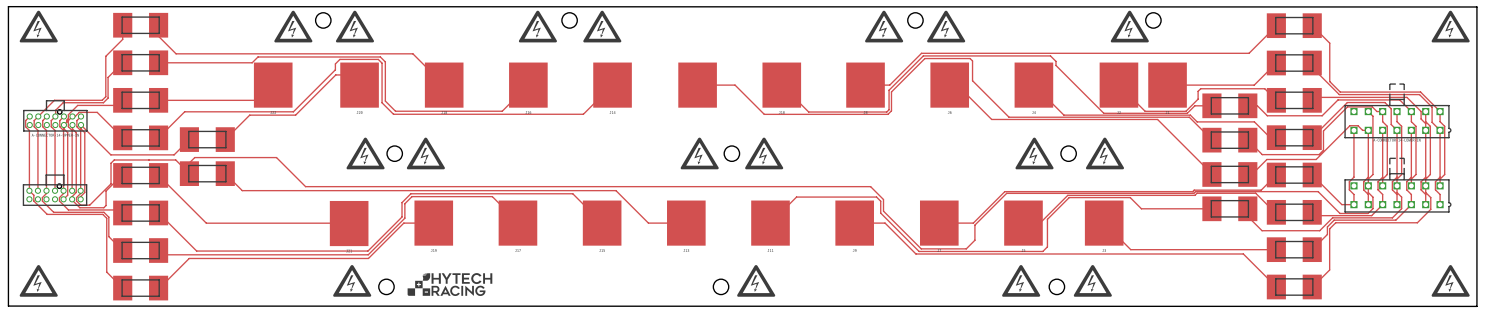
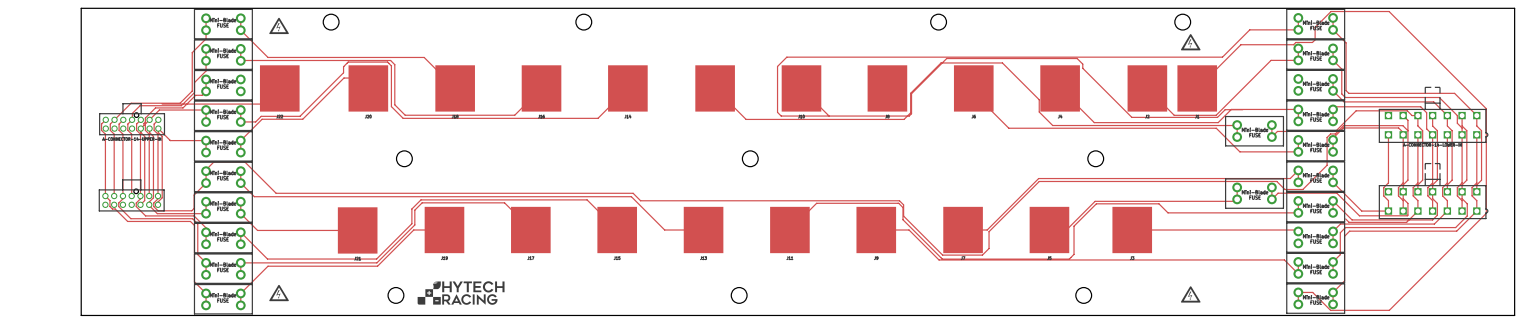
board edge: (1476, 7) (8, 6) (8, 306) (1476, 306) -> (1514, 8) (81, 8) (81, 315) (1514, 315)
drawing: [19, 10, 58, 43] -> none
drawing: [274, 10, 313, 43] -> none
drawing: [335, 10, 374, 43] -> none
drawing: [518, 10, 557, 43] -> none
drawing: [583, 10, 622, 43] -> none
drawing: [865, 10, 904, 43] -> none
drawing: [927, 10, 966, 43] -> none
drawing: [1110, 10, 1149, 43] -> none
drawing: [1431, 10, 1470, 43] -> none
track: none -> (206, 18) (206, 38) (192, 52) (192, 91) (180, 103) (131, 103) (110, 124) (110, 130) (114, 134) (114, 196)
drawing: none -> [269, 17, 289, 35]
track: none -> (1298, 17) (1298, 29) (1249, 29) (1222, 57) (786, 57) (777, 66) (777, 112) (781, 116) (829, 116)
part: none -> (223, 24)
part: none -> (1315, 24)
track: (122, 25) (122, 39) (105, 56) (105, 96) (102, 100) (54, 100) (34, 120) (34, 126) (37, 130) (37, 190) -> none
part: (140, 25) -> none
track: (158, 25) (158, 36) (176, 53) (413, 54) -> (240, 18) (240, 30) (267, 57) (424, 57)
track: (1276, 25) (1249, 53) (921, 53) (889, 85) (865, 85) -> none
part: (1294, 25) -> none
track: (1312, 25) (1329, 43) (1329, 81) (1340, 92) (1420, 92) -> (1333, 17) (1333, 29) (1346, 42) (1346, 90) (1348, 93) (1454, 93) (1456, 95)
drawing: none -> [1180, 34, 1201, 51]
track: none -> (206, 48) (206, 71) (194, 82) (194, 92) (181, 105) (140, 105) (132, 113) (132, 119) (127, 124) (127, 130) (131, 134) (131, 196)
part: none -> (223, 54)
part: none -> (1315, 54)
track: (381, 57) (257, 56) (252, 62) (158, 62) -> (390, 60) (240, 60) (240, 48)
track: (122, 62) (108, 77) (108, 98) (103, 102) (63, 102) (55, 110) (55, 116) (51, 120) (51, 126) (55, 130) (55, 190) -> none
part: (140, 62) -> none
track: (1276, 63) (1254, 85) (1167, 85) -> (1298, 304) (1298, 292) (1312, 292) (1330, 310) (1389, 310) (1486, 213) (1486, 108) (1389, 11) (1331, 11) (1315, 27) (1315, 39) (1312, 42) (1295, 42) (1293, 44) (1240, 44) (1197, 88)
part: (1294, 63) -> none
track: (1312, 63) (1312, 67) (1339, 94) (1419, 94) (1432, 107) (1432, 122) (1440, 130) -> none
track: none -> (206, 79) (206, 91) (202, 95) (195, 95) (182, 107) (155, 107) (145, 118) (143, 125) (140, 128) (140, 132) (144, 136) (144, 200) (140, 204)
part: none -> (223, 85)
part: none -> (1315, 85)
track: (697, 85) (735, 85) (764, 114) (887, 114) (891, 110) (891, 91) (924, 58) (970, 58) (972, 60) (972, 80) (1009, 117) (1189, 117) (1211, 140) -> (715, 88) (746, 119) (904, 119) (910, 112) (910, 93) (941, 62) (1002, 62) (1039, 99) (1039, 112) (1052, 125) (1237, 125) (1237, 137)
track: (949, 85) (957, 85) (991, 119) (1157, 119) (1211, 174) -> (973, 88) (973, 93) (1008, 128) (1216, 128) (1239, 151) (1298, 151) (1298, 139)
track: (1406, 97) (1315, 97) (1312, 100) -> (1442, 101) (1439, 97) (1345, 97) (1341, 93) (1341, 69) (1333, 60) (1333, 48)
track: (1198, 99) (1198, 91) (1200, 88) (1264, 88) (1276, 100) -> (1228, 102) (1271, 60) (1298, 60) (1298, 48)
track: (1399, 99) (1338, 99) (1322, 115) (1267, 115) (1257, 105) (1247, 105) -> (1435, 103) (1433, 101) (1344, 101) (1333, 90) (1333, 78)
track: (122, 100) (117, 105) (77, 105) (68, 114) (66, 121) (63, 125) (63, 128) (67, 132) (67, 195) (63, 199) -> none
part: (140, 100) -> none
part: (1294, 100) -> none
track: (1385, 102) (1347, 102) (1312, 137) -> (1420, 106) (1335, 106) (1333, 109) (1333, 121)
part: (1229, 105) -> none
track: (1347, 106) (1323, 130) (1323, 150) (1319, 154) (1262, 154) (1247, 140) -> (1381, 110) (1356, 110) (1335, 131) (1277, 131) (1271, 137) (1271, 125)
part: none -> (223, 115)
track: (293, 111) (184, 111) (158, 137) -> (300, 115) (261, 116) (255, 121) (240, 121) (240, 110)
part: none -> (1315, 115)
part position: (55, 115) -> (132, 119)
track: none -> (105, 119) (101, 124) (101, 130) (105, 134) (105, 196) (109, 200) (109, 206) (127, 221) (190, 221) (194, 225) (194, 281) (206, 293) (206, 305)
track: none -> (123, 119) (119, 124) (119, 130) (122, 134) (122, 198) (118, 203) (118, 206) (130, 218) (192, 218) (197, 223) (197, 254) (206, 262) (206, 274)
track: none -> (140, 119) (136, 124) (136, 130) (140, 134) (140, 198) (136, 203) (136, 206) (145, 215) (194, 215) (206, 227) (206, 244)
track: none -> (158, 119) (154, 124) (154, 130) (157, 134) (157, 198) (153, 203) (153, 206) (158, 210) (191, 210) (194, 208) (194, 195) (206, 183) (206, 169) (213, 161) (244, 161) (276, 193) (633, 193) (640, 200) (899, 200) (903, 204) (903, 216) (942, 255) (982, 255) (989, 248) (989, 231) (1039, 181) (1276, 181) (1284, 189) (1302, 189) (1327, 165) (1327, 137) (1330, 133) (1335, 133) (1343, 125) (1402, 125) (1407, 130)
track: (256, 115) (249, 115) (225, 139) -> (262, 119) (240, 140) (240, 152)
track: (1063, 115) (1190, 115) (1197, 121) (1254, 121) (1270, 137) (1276, 137) -> (1090, 119) (1094, 122) (1218, 122) (1231, 109) (1298, 109) (1298, 121)
track: (29, 116) (25, 120) (25, 126) (29, 130) (29, 190) (33, 195) (33, 201) (47, 214) (102, 214) (106, 218) (106, 272) (122, 288) -> none
track: (46, 116) (42, 120) (42, 126) (46, 130) (46, 193) (42, 197) (42, 201) (53, 212) (103, 212) (108, 217) (108, 236) (122, 250) -> none
track: (63, 116) (59, 120) (59, 126) (63, 130) (63, 193) (59, 197) (59, 201) (68, 209) (119, 209) (122, 212) -> none
track: (81, 116) (76, 120) (76, 126) (80, 130) (80, 193) (76, 197) (76, 201) (80, 205) (89, 205) (111, 183) (111, 163) (114, 160) (175, 160) (189, 173) (189, 162) (194, 157) (276, 157) (305, 186) (870, 186) (883, 199) (883, 211) (921, 248) (966, 248) (974, 240) (974, 225) (1006, 193) (1318, 191) (1340, 213) (1368, 213) (1372, 209) -> (1271, 187) (1271, 199) (1278, 193) (1336, 193) (1359, 215) (1407, 215)
track: none -> (206, 121) (206, 110) (159, 110) (145, 124) (145, 130) (149, 134) (149, 196)
track: none -> (149, 128) (149, 132) (153, 136) (153, 197) (149, 202) (149, 205) (157, 213) (206, 213) (206, 201)
track: (72, 125) (72, 128) (76, 132) (76, 192) (72, 196) (72, 200) (79, 207) (103, 207) (106, 205) (106, 191) (122, 175) -> none
part: none -> (1254, 131)
track: (1368, 130) (1362, 130) (1357, 125) (1349, 125) (1316, 159) (1266, 159) (1251, 174) (1247, 174) -> (1403, 134) (1398, 127) (1343, 127) (1333, 138) (1333, 151)
track: (122, 137) (97, 112) (79, 112) (68, 120) (68, 126) (72, 130) (72, 190) -> none
part: (140, 137) -> none
drawing: [346, 137, 385, 170] -> none
drawing: [406, 137, 445, 170] -> none
drawing: [680, 137, 719, 170] -> none
drawing: [745, 137, 784, 170] -> none
drawing: [1015, 137, 1054, 170] -> none
drawing: [1085, 137, 1124, 170] -> none
part: (1294, 137) -> none
track: (189, 139) (174, 154) (110, 154) (81, 125) (81, 128) (84, 132) (84, 192) (80, 199) -> none
part: (207, 139) -> none
part: (1229, 140) -> none
part: none -> (223, 146)
part: none -> (1315, 146)
track: none -> (206, 152) (206, 140) (170, 140) (158, 128) (158, 132) (162, 136) (162, 197) (157, 204)
part: none -> (223, 176)
part: none -> (1315, 176)
part: (207, 173) -> none
track: (225, 173) (242, 190) (248, 190) -> (240, 171) (240, 183) (254, 196)
part: (1229, 174) -> none
part: (140, 175) -> none
track: (158, 175) (206, 223) (349, 223) -> (240, 201) (240, 213) (257, 230) (357, 230)
track: (1276, 175) (1261, 190) (1004, 191) (973, 223) (962, 223) -> (1298, 182) (1298, 170) (1290, 178) (1038, 178) (987, 230)
part: (1294, 175) -> none
track: (1312, 175) (1341, 204) -> (1333, 170) (1333, 182) (1361, 211) (1376, 211)
part: none -> (1254, 193)
part position: (55, 190) -> (131, 195)
track: (1067, 195) (1255, 193) (1276, 212) -> (1094, 201) (1235, 201) (1237, 199) (1237, 187)
part: none -> (1315, 207)
part: none -> (223, 207)
track: none -> (1476, 211) (1456, 231) (1349, 231) (1344, 236) (1344, 280) (1333, 292) (1333, 304)
track: (1139, 206) (1141, 208) (1211, 208) -> (1167, 212) (1298, 212) (1298, 200)
part: (1229, 208) -> none
track: (1247, 208) (1247, 216) (1262, 230) (1319, 230) (1332, 217) (1392, 217) (1397, 213) -> (1333, 212) (1333, 200) (1352, 219) (1432, 219)
part: (140, 212) -> none
track: (158, 212) (196, 251) (367, 251) -> (240, 244) (240, 232) (267, 259) (376, 258)
part: (1294, 212) -> none
track: (1398, 217) (1395, 220) (1334, 220) (1327, 226) (1327, 234) (1312, 249) -> (1434, 224) (1340, 224) (1333, 231) (1333, 243)
track: (1419, 220) (1417, 222) (1335, 222) (1329, 228) (1329, 269) (1312, 287) -> (1455, 227) (1345, 227) (1340, 232) (1340, 254) (1333, 261) (1333, 273)
track: (885, 223) (915, 253) (1243, 253) (1276, 287) -> (907, 230) (939, 259) (1284, 259) (1298, 273) (1298, 261)
track: (1104, 223) (1130, 249) (1276, 249) -> (1132, 230) (1296, 230) (1298, 231)
part: none -> (223, 238)
part: none -> (1315, 237)
part: (1294, 249) -> none
part: (140, 250) -> none
track: (158, 250) (162, 254) (368, 254) -> (240, 274) (240, 262) (377, 262)
track: (368, 258) (189, 258) (158, 288) -> (377, 266) (268, 266) (240, 293) (240, 305)
part: none -> (223, 268)
part: none -> (1315, 268)
drawing: [19, 265, 58, 297] -> none
drawing: [333, 265, 372, 297] -> none
drawing: [737, 265, 776, 297] -> none
drawing: [1002, 265, 1041, 297] -> none
drawing: [1073, 265, 1112, 297] -> none
drawing: [1431, 265, 1470, 297] -> none
drawing: none -> [269, 284, 289, 302]
drawing: none -> [1180, 286, 1201, 303]
part: (1294, 287) -> none
part: (140, 288) -> none
part: none -> (1315, 298)
part: none -> (223, 299)

